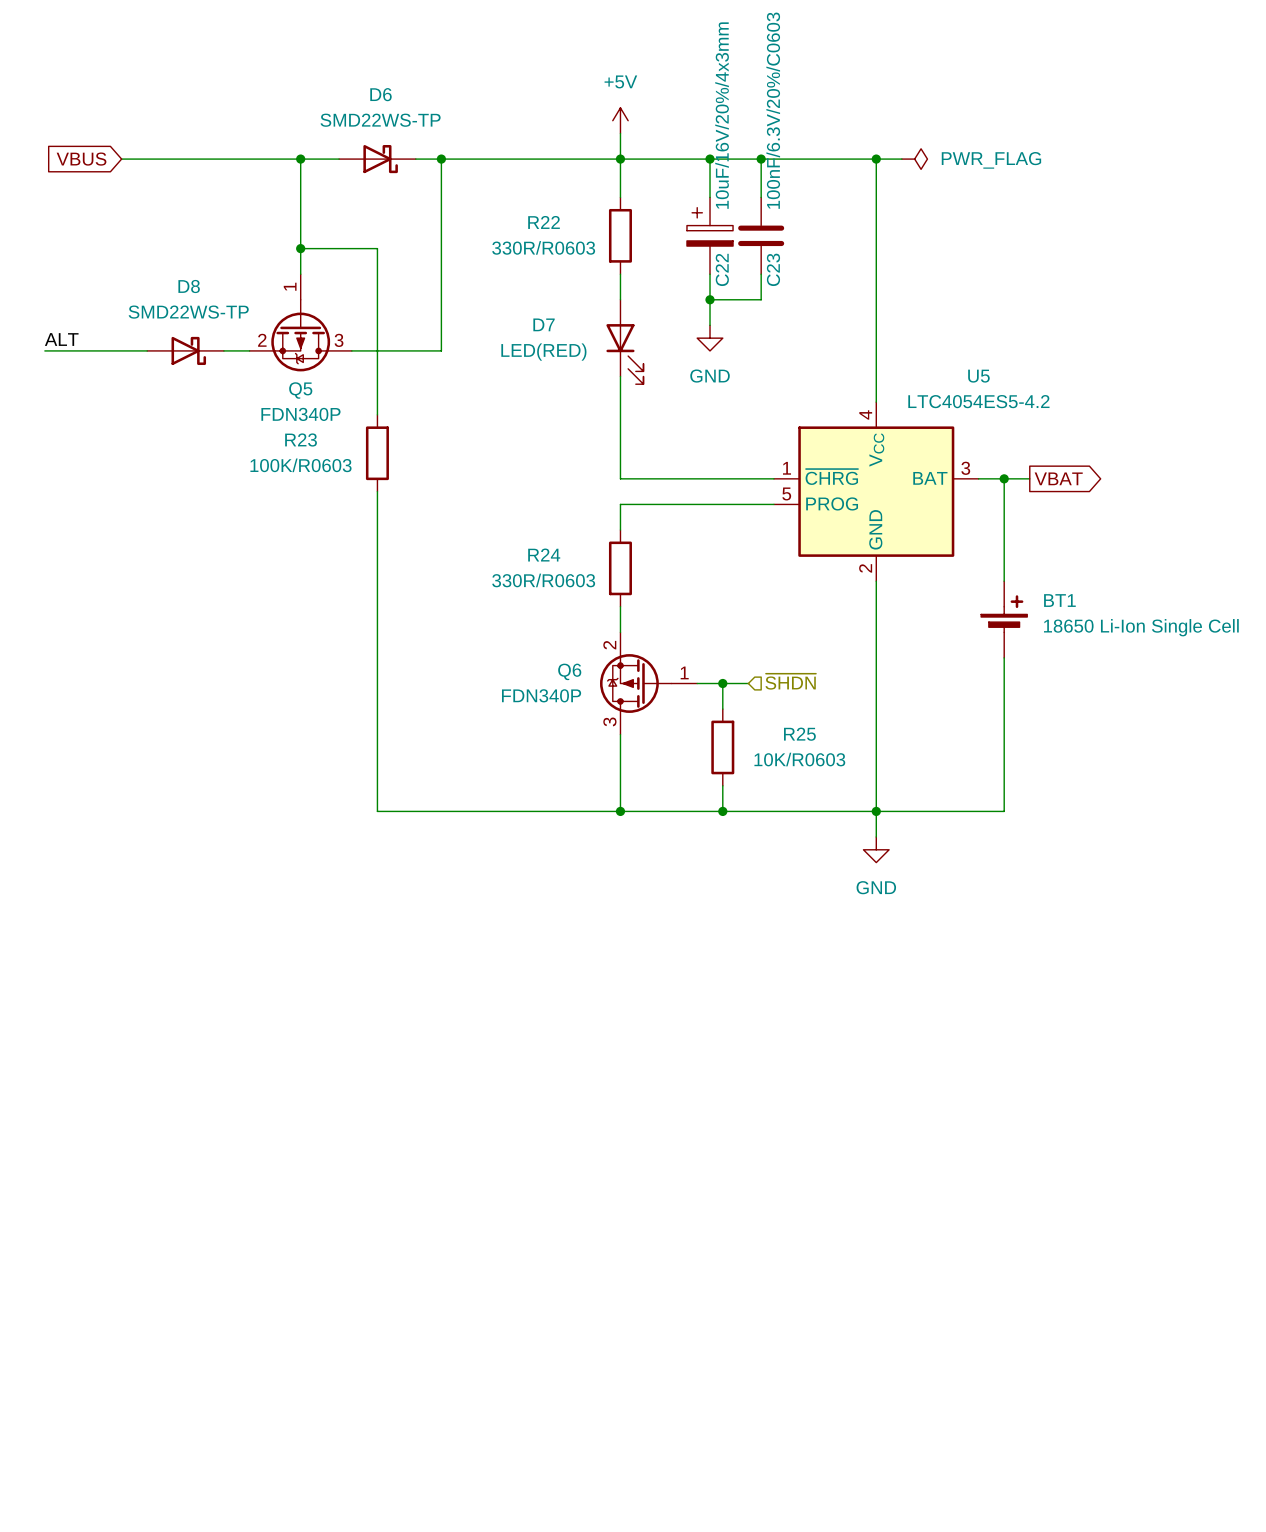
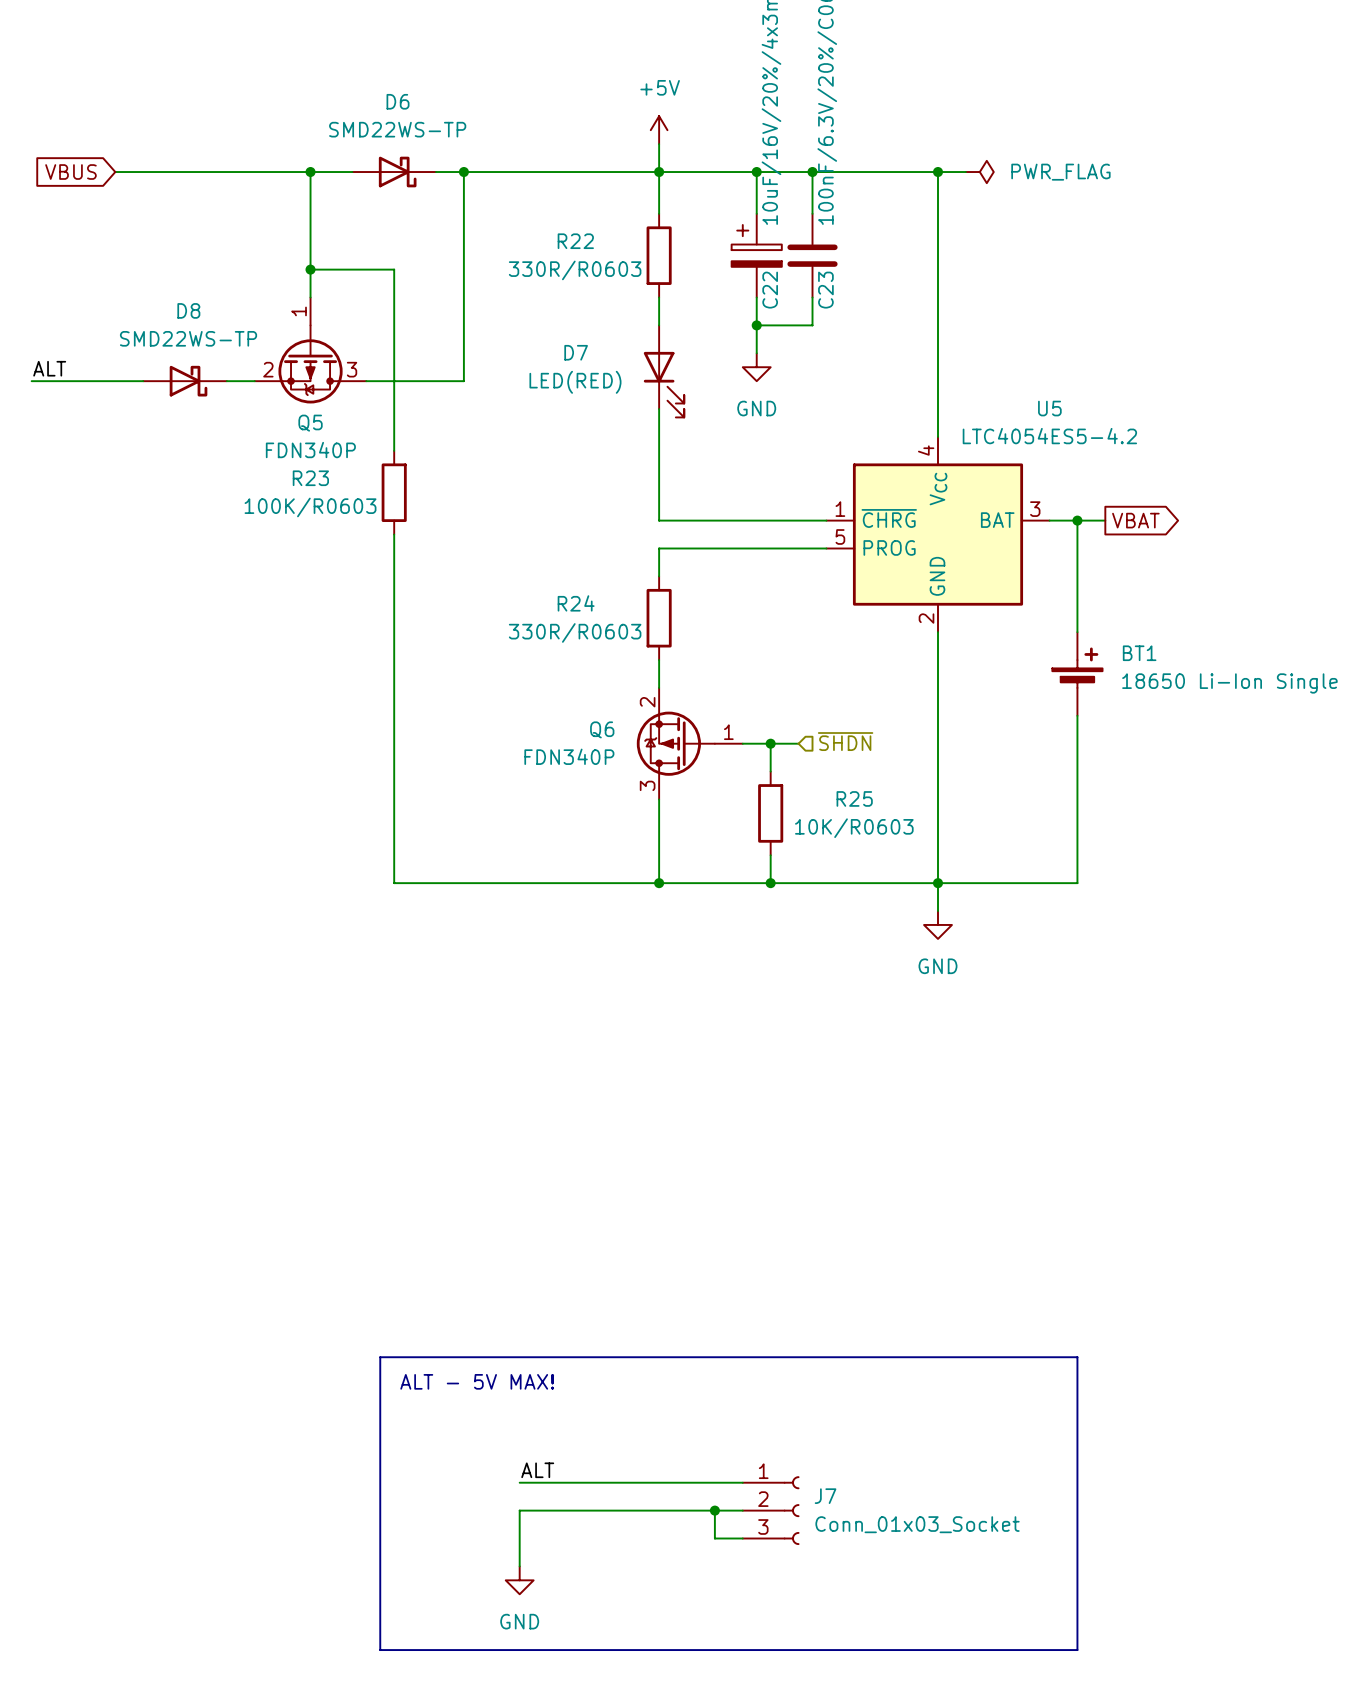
line: none -> (380, 1357) (1077, 1357) (1077, 1650) (380, 1650) (380, 1357)
text: none -> ALT - 5V MAX! (477, 1381)
label: none -> ALT (537, 1470)
wire: none -> (519, 1482) (742, 1482)
wire: none -> (714, 1510) (714, 1538) (742, 1538)
junction: none -> (714, 1510)
wire: none -> (742, 1510) (519, 1510) (519, 1566)
J7: none -> Conn_01x03_Socket (771, 1510)
power symbol: none -> GND (519, 1580)

